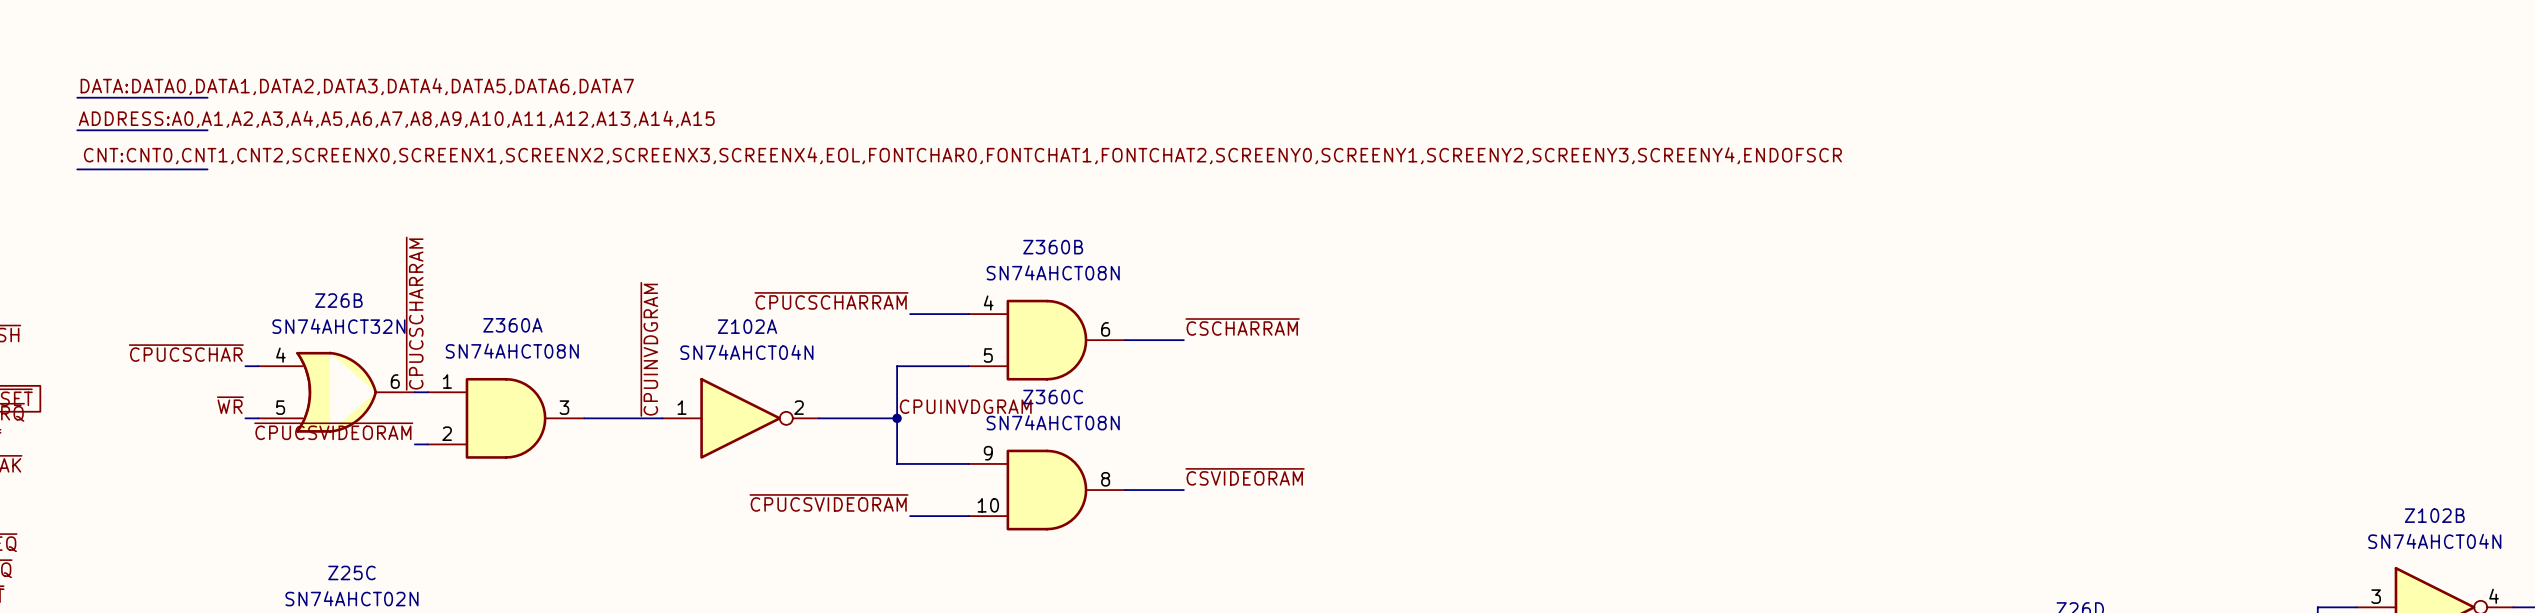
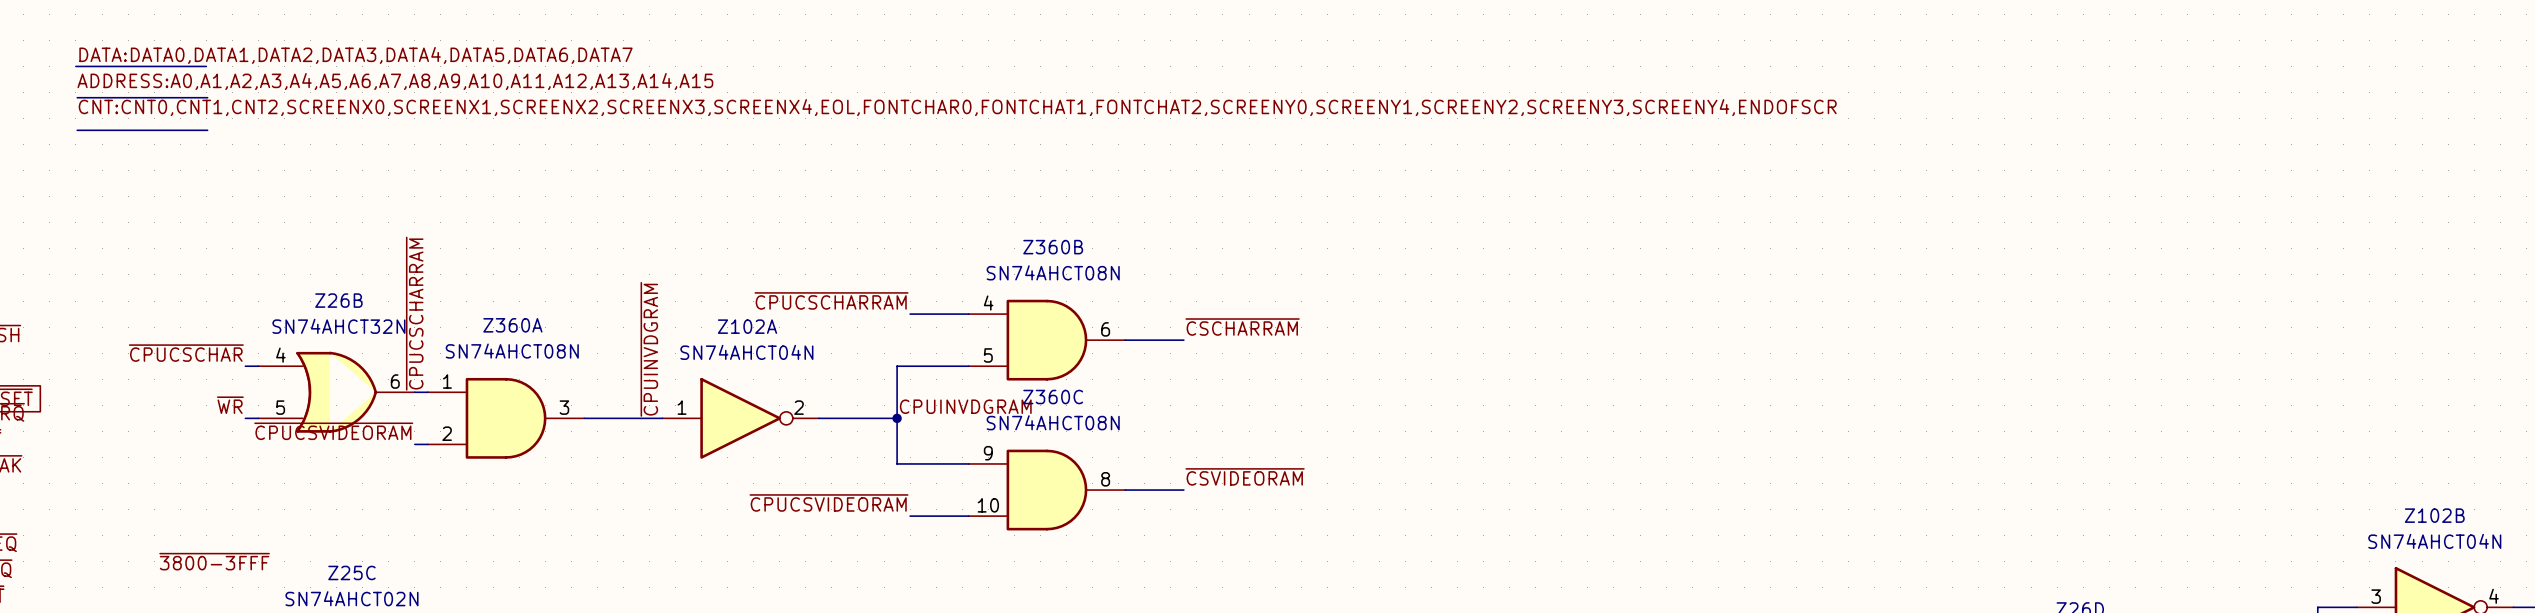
label position: DATA:DATA0,DATA1,DATA2,DATA3,DATA4,DATA5,DATA6,DATA7 (357, 86) -> DATA:DATA0,DATA1,DATA2,DATA3,DATA4,DATA5,DATA6,DATA7 (355, 55)
label position: ADDRESS:A0,A1,A2,A3,A4,A5,A6,A7,A8,A9,A10,A11,A12,A13,A14,A15 (396, 119) -> ADDRESS:A0,A1,A2,A3,A4,A5,A6,A7,A8,A9,A10,A11,A12,A13,A14,A15 (395, 81)
label position: CNT:CNT0,CNT1,CNT2,SCREENX0,SCREENX1,SCREENX2,SCREENX3,SCREENX4,EOL,FONTCHAR0,FONTCHAT1,FONTCHAT2,SCREENY0,SCREENY1,SCREENY2,SCREENY3,SCREENY4,ENDOFSCR (962, 155) -> CNT:CNT0,CNT1,CNT2,SCREENX0,SCREENX1,SCREENX2,SCREENX3,SCREENX4,EOL,FONTCHAR0,FONTCHAT1,FONTCHAT2,SCREENY0,SCREENY1,SCREENY2,SCREENY3,SCREENY4,ENDOFSCR (957, 107)
bus: (77, 169) (207, 169) -> (75, 66) (206, 66)
label: none -> ~{3800-3FFF} (214, 561)

